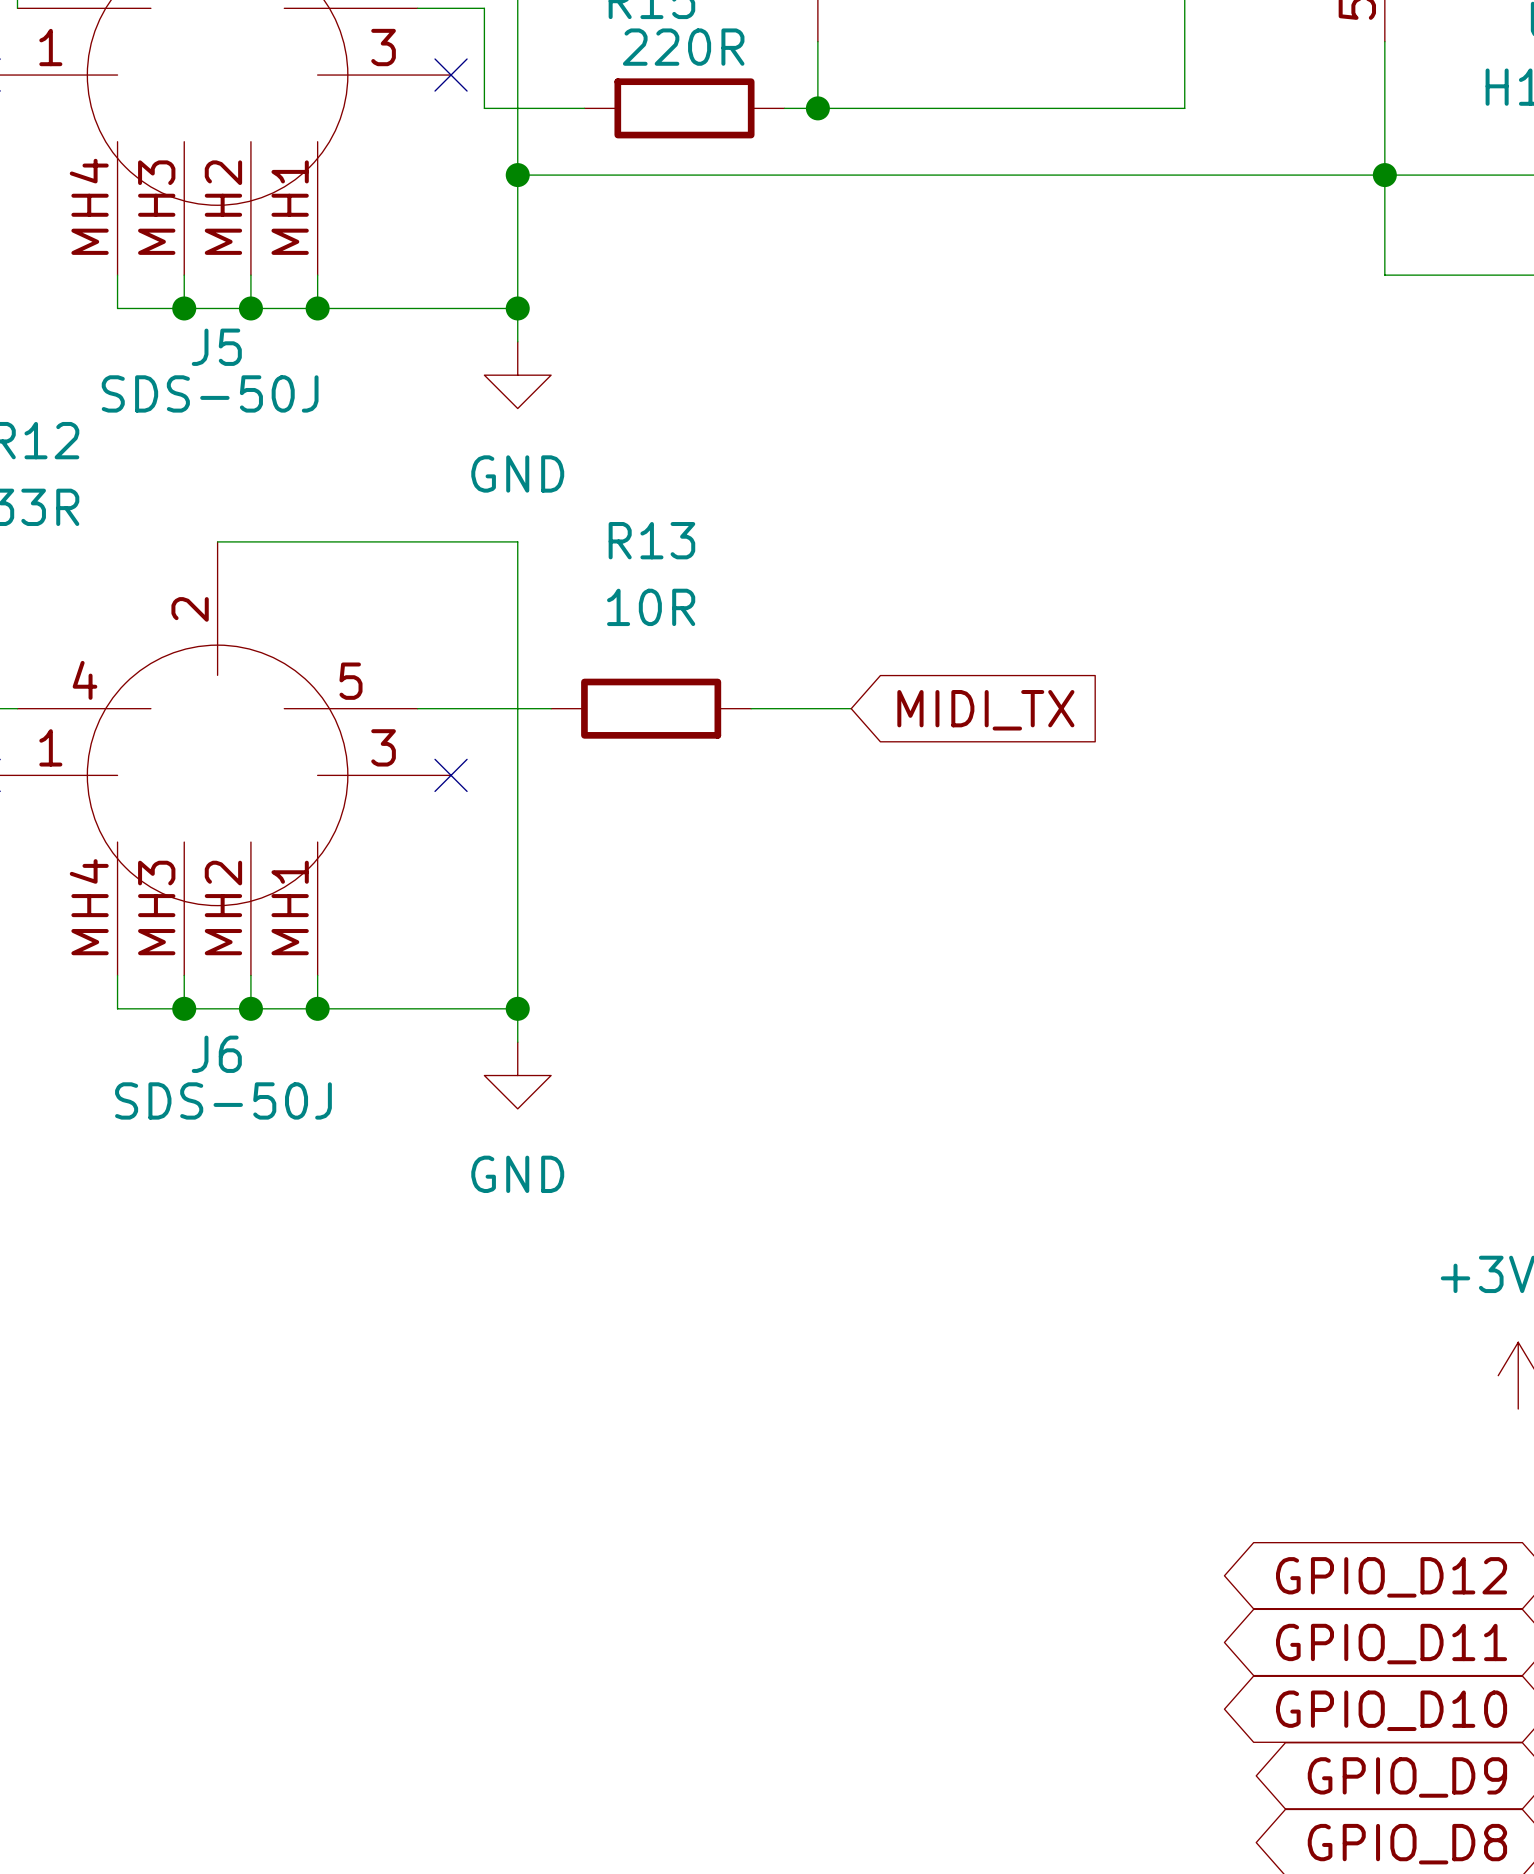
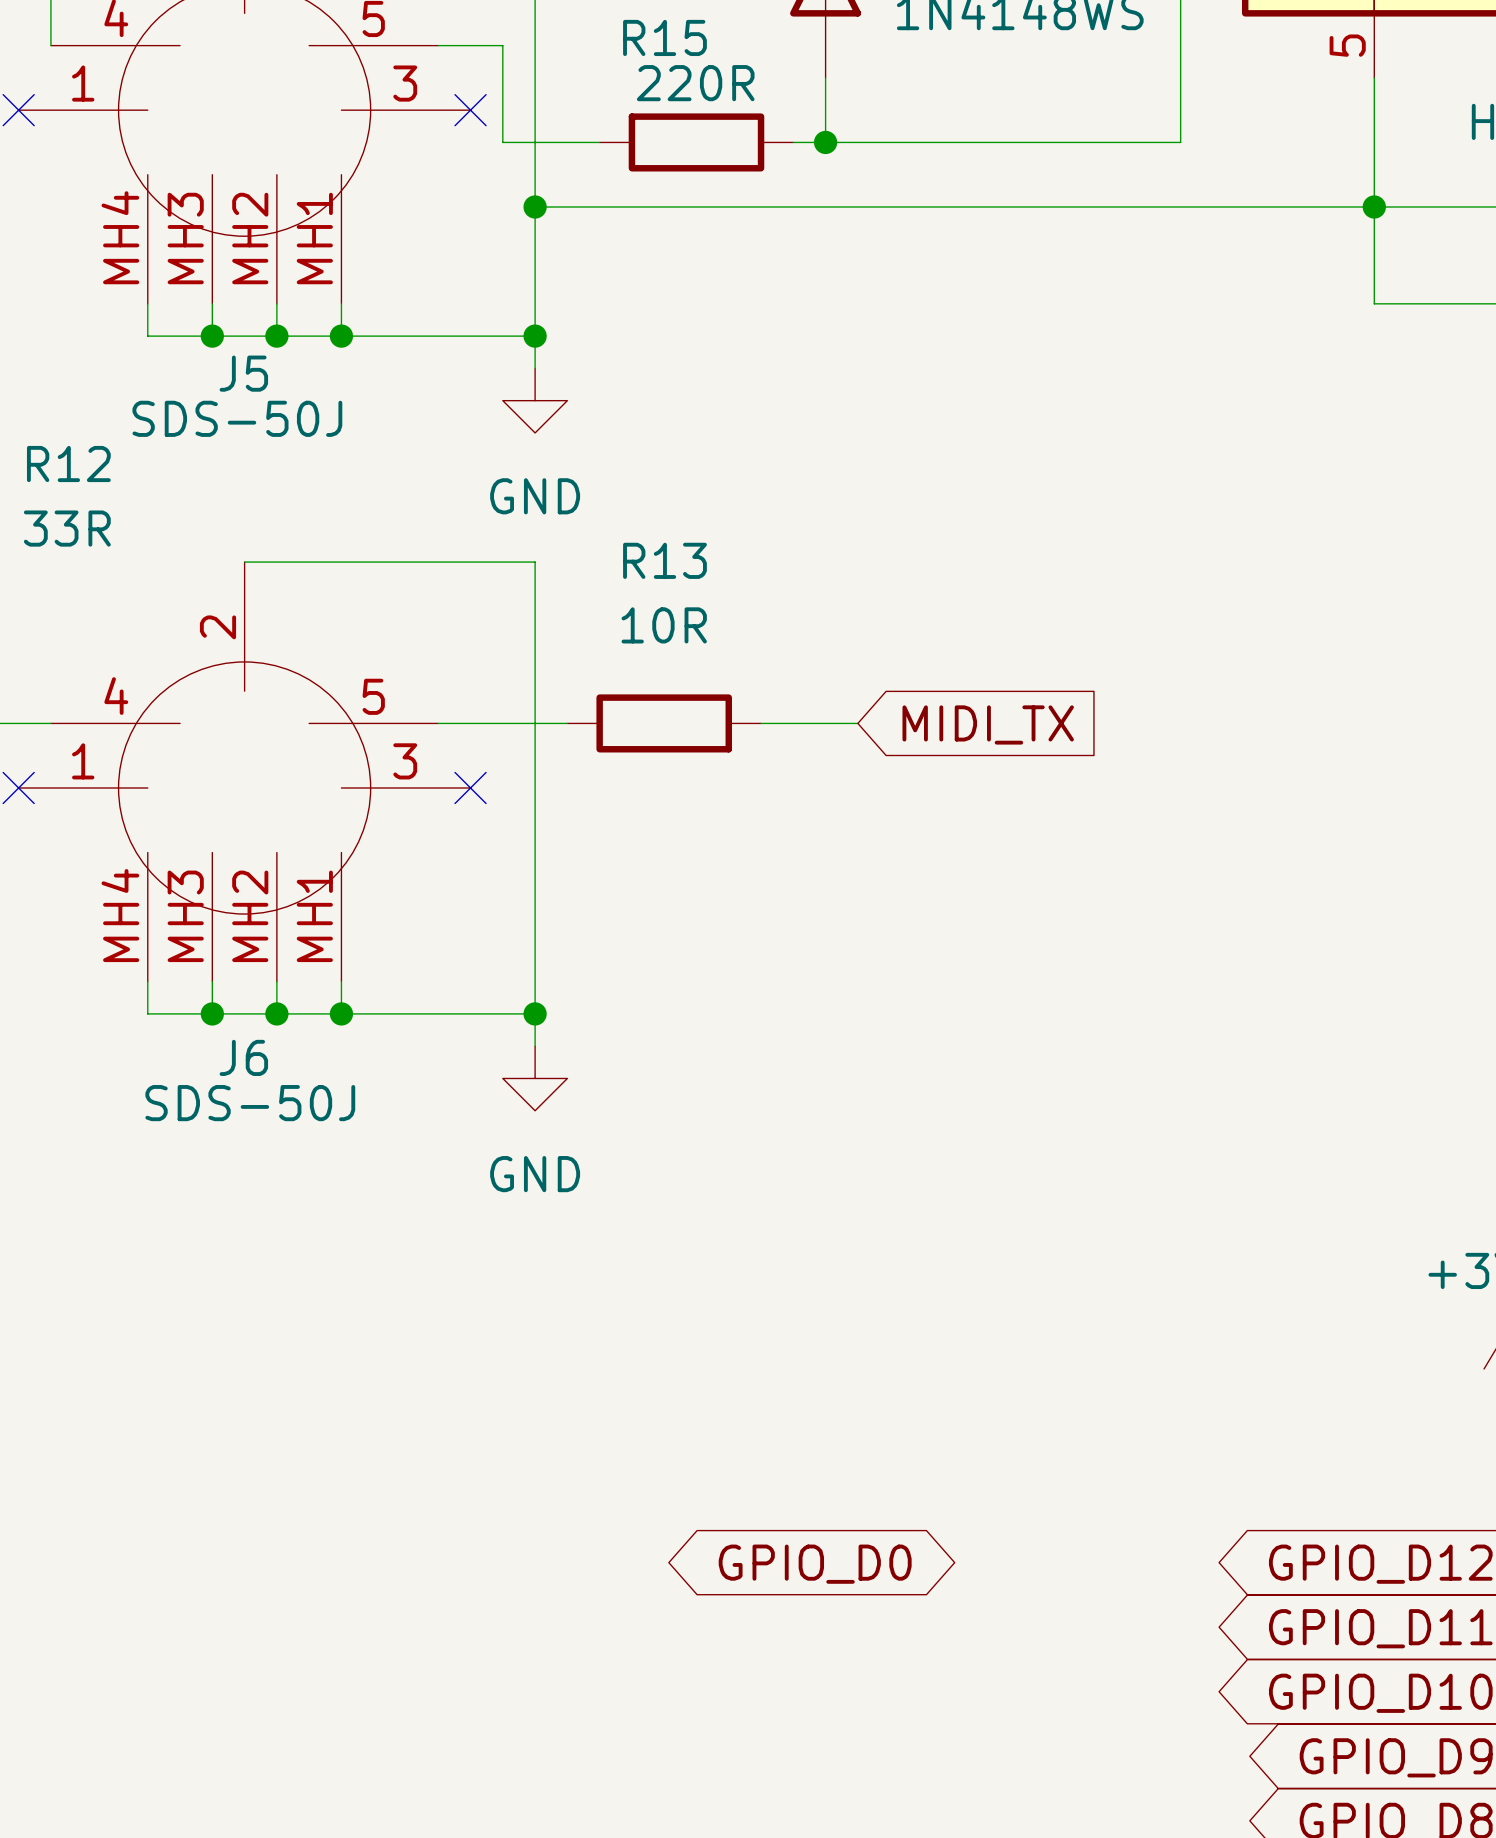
global label: none -> GPIO_D0 (815, 1564)

